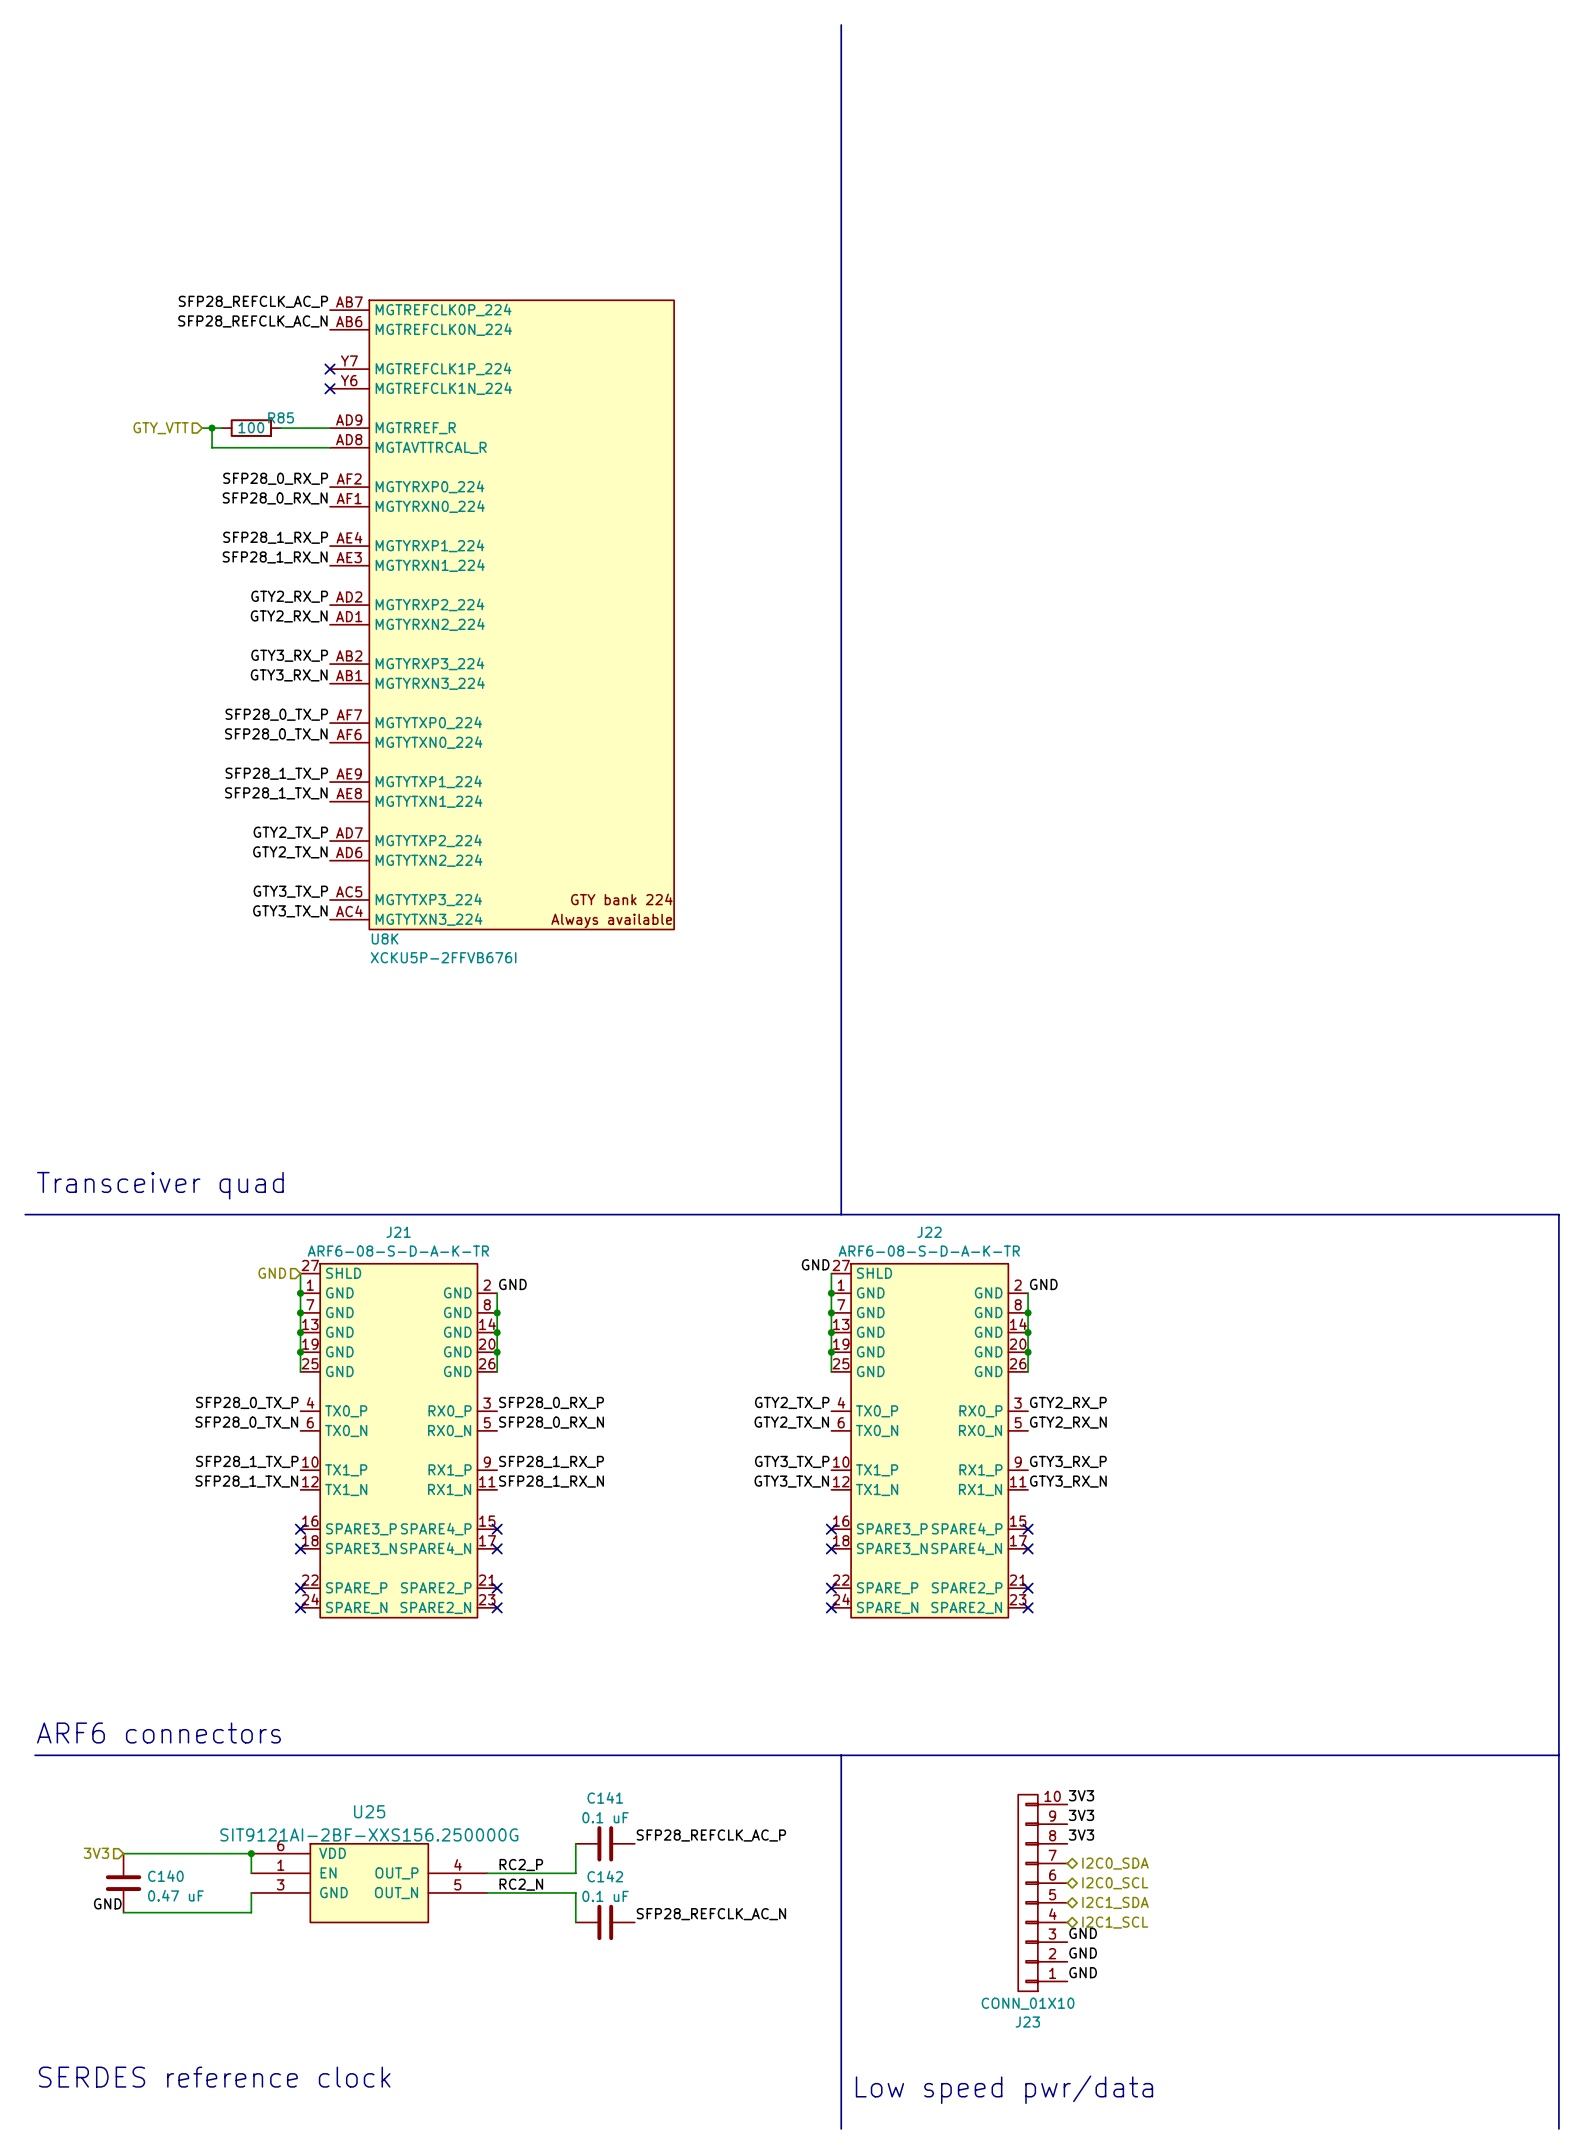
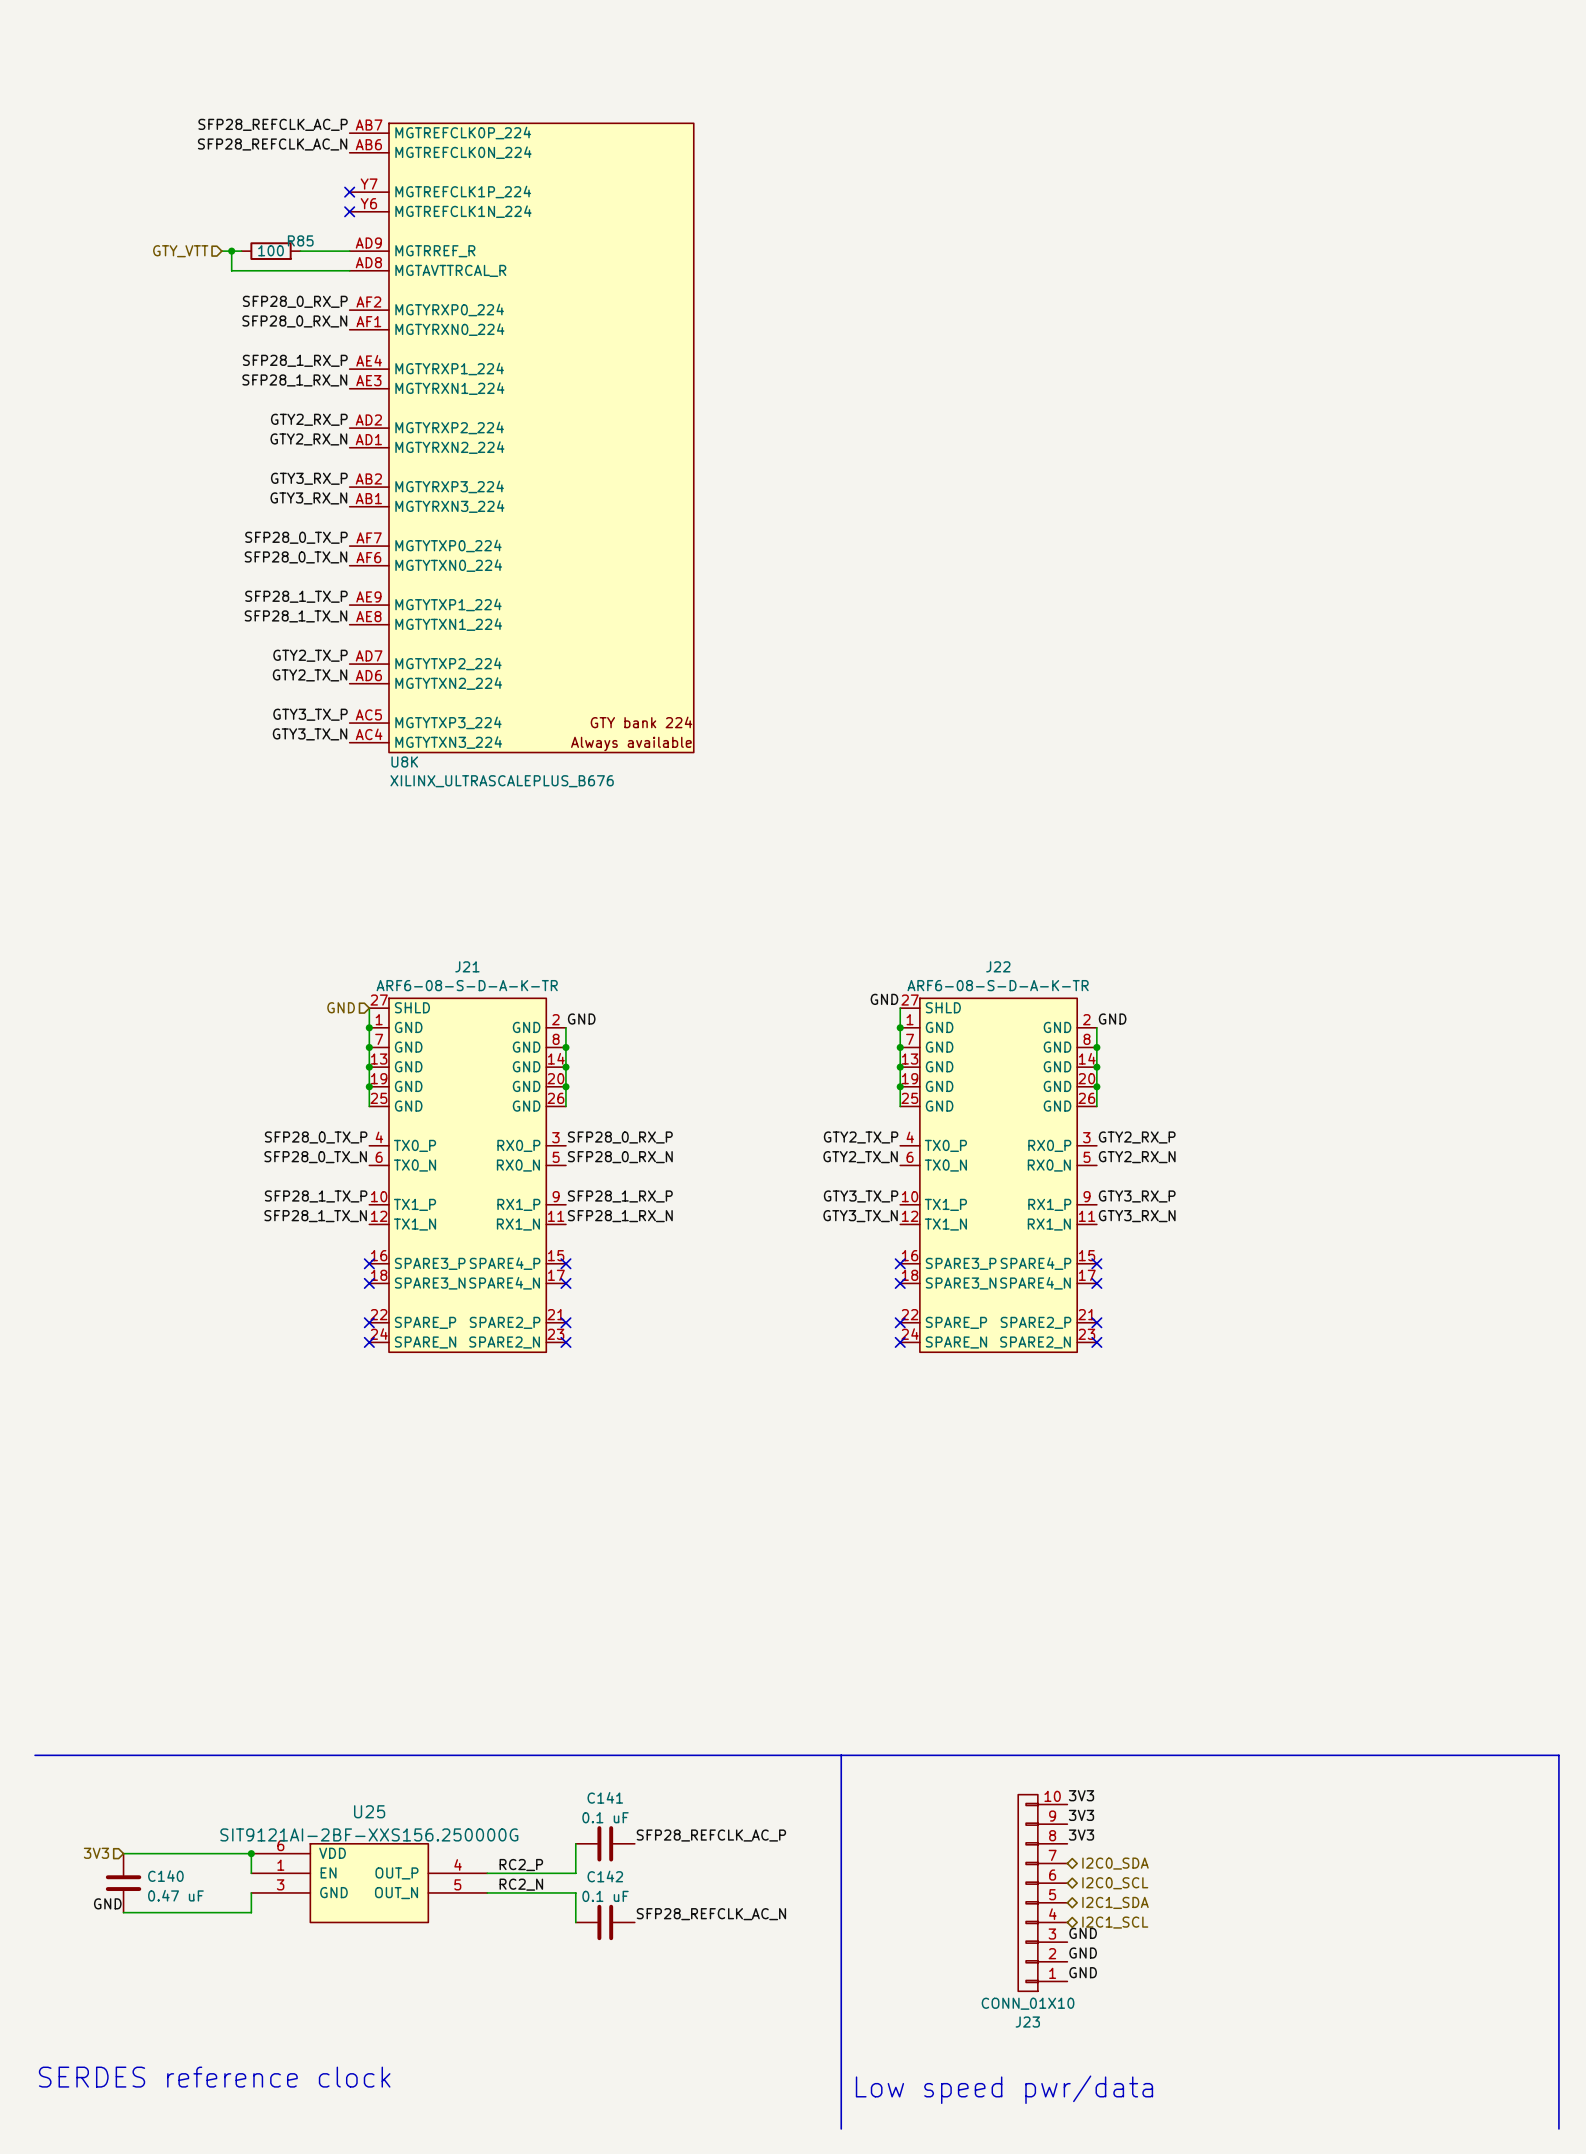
line: (841, 25) (841, 1214) -> none
no-connect mark: none -> (349, 192)
no-connect mark: none -> (349, 211)
junction: none -> (231, 251)
label position: SFP28_REFCLK_AC_P (253, 301) -> SFP28_REFCLK_AC_P (273, 124)
label position: SFP28_REFCLK_AC_N (252, 321) -> SFP28_REFCLK_AC_N (272, 144)
no-connect mark: (330, 369) -> none
no-connect mark: (330, 388) -> none
hierarchical label position: GTY_VTT (161, 428) -> GTY_VTT (180, 251)
wire: (202, 428) (221, 428) -> (221, 251) (241, 251)
wire: (212, 428) (212, 447) (330, 447) -> (231, 251) (231, 270) (349, 270)
junction: (212, 428) -> none
R85 position: (251, 428) -> (271, 251)
wire: (280, 428) (330, 428) -> (300, 251) (349, 251)
label position: SFP28_0_RX_P (275, 478) -> SFP28_0_RX_P (295, 301)
label position: SFP28_0_RX_N (275, 498) -> SFP28_0_RX_N (294, 321)
label position: SFP28_1_RX_P (275, 537) -> SFP28_1_RX_P (295, 360)
label position: SFP28_1_RX_N (275, 557) -> SFP28_1_RX_N (294, 380)
label position: GTY2_RX_P (289, 596) -> GTY2_RX_P (309, 419)
U8K position: (502, 614) -> (522, 437)
label position: GTY2_RX_N (289, 616) -> GTY2_RX_N (308, 439)
label position: GTY3_RX_P (289, 655) -> GTY3_RX_P (309, 478)
label position: GTY3_RX_N (289, 675) -> GTY3_RX_N (308, 498)
label position: SFP28_0_TX_P (276, 714) -> SFP28_0_TX_P (296, 537)
label position: SFP28_0_TX_N (276, 734) -> SFP28_0_TX_N (295, 557)
label position: SFP28_1_TX_P (276, 773) -> SFP28_1_TX_P (296, 596)
label position: SFP28_1_TX_N (276, 793) -> SFP28_1_TX_N (295, 616)
label position: GTY2_TX_P (290, 832) -> GTY2_TX_P (310, 655)
label position: GTY2_TX_N (290, 852) -> GTY2_TX_N (310, 675)
label position: GTY3_TX_P (290, 891) -> GTY3_TX_P (310, 714)
label position: GTY3_TX_N (290, 911) -> GTY3_TX_N (310, 734)
U8K value: XCKU5P-2FFVB676I (443, 957) -> XILINX_ULTRASCALEPLUS_B676 (502, 781)
label: none -> GND (884, 999)
hierarchical label: none -> GND (341, 1007)
wire: none -> (369, 1008) (369, 1106)
wire: none -> (900, 1008) (900, 1106)
label: none -> GND (581, 1019)
label: none -> GND (1112, 1019)
junction: none -> (369, 1027)
wire: none -> (565, 1027) (565, 1106)
junction: none -> (900, 1027)
wire: none -> (1096, 1027) (1096, 1106)
junction: none -> (369, 1047)
junction: none -> (565, 1047)
junction: none -> (900, 1047)
junction: none -> (1096, 1047)
junction: none -> (369, 1067)
junction: none -> (565, 1067)
junction: none -> (900, 1067)
junction: none -> (1096, 1067)
junction: none -> (369, 1086)
junction: none -> (565, 1086)
junction: none -> (900, 1086)
junction: none -> (1096, 1086)
label: none -> SFP28_0_TX_P (316, 1137)
label: none -> SFP28_0_RX_P (620, 1137)
label: none -> GTY2_TX_P (861, 1137)
label: none -> GTY2_RX_P (1137, 1137)
label: none -> SFP28_0_TX_N (315, 1157)
label: none -> SFP28_0_RX_N (620, 1157)
label: none -> GTY2_TX_N (860, 1157)
label: none -> GTY2_RX_N (1137, 1157)
text: Transceiver quad (160, 1185) -> none
label: none -> SFP28_1_TX_P (316, 1196)
label: none -> SFP28_1_RX_P (620, 1196)
label: none -> GTY3_TX_P (861, 1196)
label: none -> GTY3_RX_P (1137, 1196)
line: (25, 1214) (1558, 1214) (1558, 1755) -> none
label: none -> SFP28_1_TX_N (315, 1216)
label: none -> SFP28_1_RX_N (620, 1216)
label: none -> GTY3_TX_N (860, 1216)
label: none -> GTY3_RX_N (1137, 1216)
no-connect mark: none -> (369, 1263)
no-connect mark: none -> (565, 1263)
no-connect mark: none -> (900, 1263)
no-connect mark: none -> (1096, 1263)
label: GND (815, 1264) -> none
hierarchical label: GND (272, 1273) -> none
wire: (300, 1273) (300, 1371) -> none
wire: (831, 1273) (831, 1371) -> none
no-connect mark: none -> (369, 1283)
no-connect mark: none -> (565, 1283)
no-connect mark: none -> (900, 1283)
no-connect mark: none -> (1096, 1283)
label: GND (512, 1284) -> none
label: GND (1043, 1284) -> none
junction: (300, 1293) -> none
junction: (831, 1293) -> none
junction: (300, 1312) -> none
junction: (497, 1312) -> none
junction: (831, 1312) -> none
junction: (1028, 1312) -> none
no-connect mark: none -> (369, 1322)
no-connect mark: none -> (565, 1322)
no-connect mark: none -> (900, 1322)
no-connect mark: none -> (1096, 1322)
junction: (300, 1332) -> none
junction: (497, 1332) -> none
junction: (831, 1332) -> none
junction: (1028, 1332) -> none
no-connect mark: none -> (369, 1342)
no-connect mark: none -> (565, 1342)
no-connect mark: none -> (900, 1342)
no-connect mark: none -> (1096, 1342)
junction: (300, 1352) -> none
junction: (497, 1352) -> none
junction: (831, 1352) -> none
junction: (1028, 1352) -> none
label: SFP28_0_TX_P (247, 1402) -> none
label: SFP28_0_RX_P (551, 1402) -> none
label: GTY2_TX_P (792, 1402) -> none
label: GTY2_RX_P (1068, 1402) -> none
label: SFP28_0_TX_N (246, 1422) -> none
label: SFP28_0_RX_N (551, 1422) -> none
label: GTY2_TX_N (791, 1422) -> none
label: GTY2_RX_N (1068, 1422) -> none
J21 position: (398, 1440) -> (467, 1175)
J22 position: (929, 1440) -> (998, 1175)
label: SFP28_1_TX_P (247, 1461) -> none
label: SFP28_1_RX_P (551, 1461) -> none
label: GTY3_TX_P (792, 1461) -> none
label: GTY3_RX_P (1068, 1461) -> none
label: SFP28_1_TX_N (246, 1481) -> none
label: SFP28_1_RX_N (551, 1481) -> none
label: GTY3_TX_N (791, 1481) -> none
label: GTY3_RX_N (1068, 1481) -> none
no-connect mark: (300, 1529) -> none
no-connect mark: (497, 1529) -> none
no-connect mark: (831, 1529) -> none
no-connect mark: (1028, 1529) -> none
no-connect mark: (300, 1548) -> none
no-connect mark: (497, 1548) -> none
no-connect mark: (831, 1548) -> none
no-connect mark: (1028, 1548) -> none
no-connect mark: (300, 1588) -> none
no-connect mark: (497, 1588) -> none
no-connect mark: (831, 1588) -> none
no-connect mark: (1028, 1588) -> none
no-connect mark: (300, 1607) -> none
no-connect mark: (497, 1607) -> none
no-connect mark: (831, 1607) -> none
no-connect mark: (1028, 1607) -> none
text: ARF6 connectors (158, 1733) -> none

